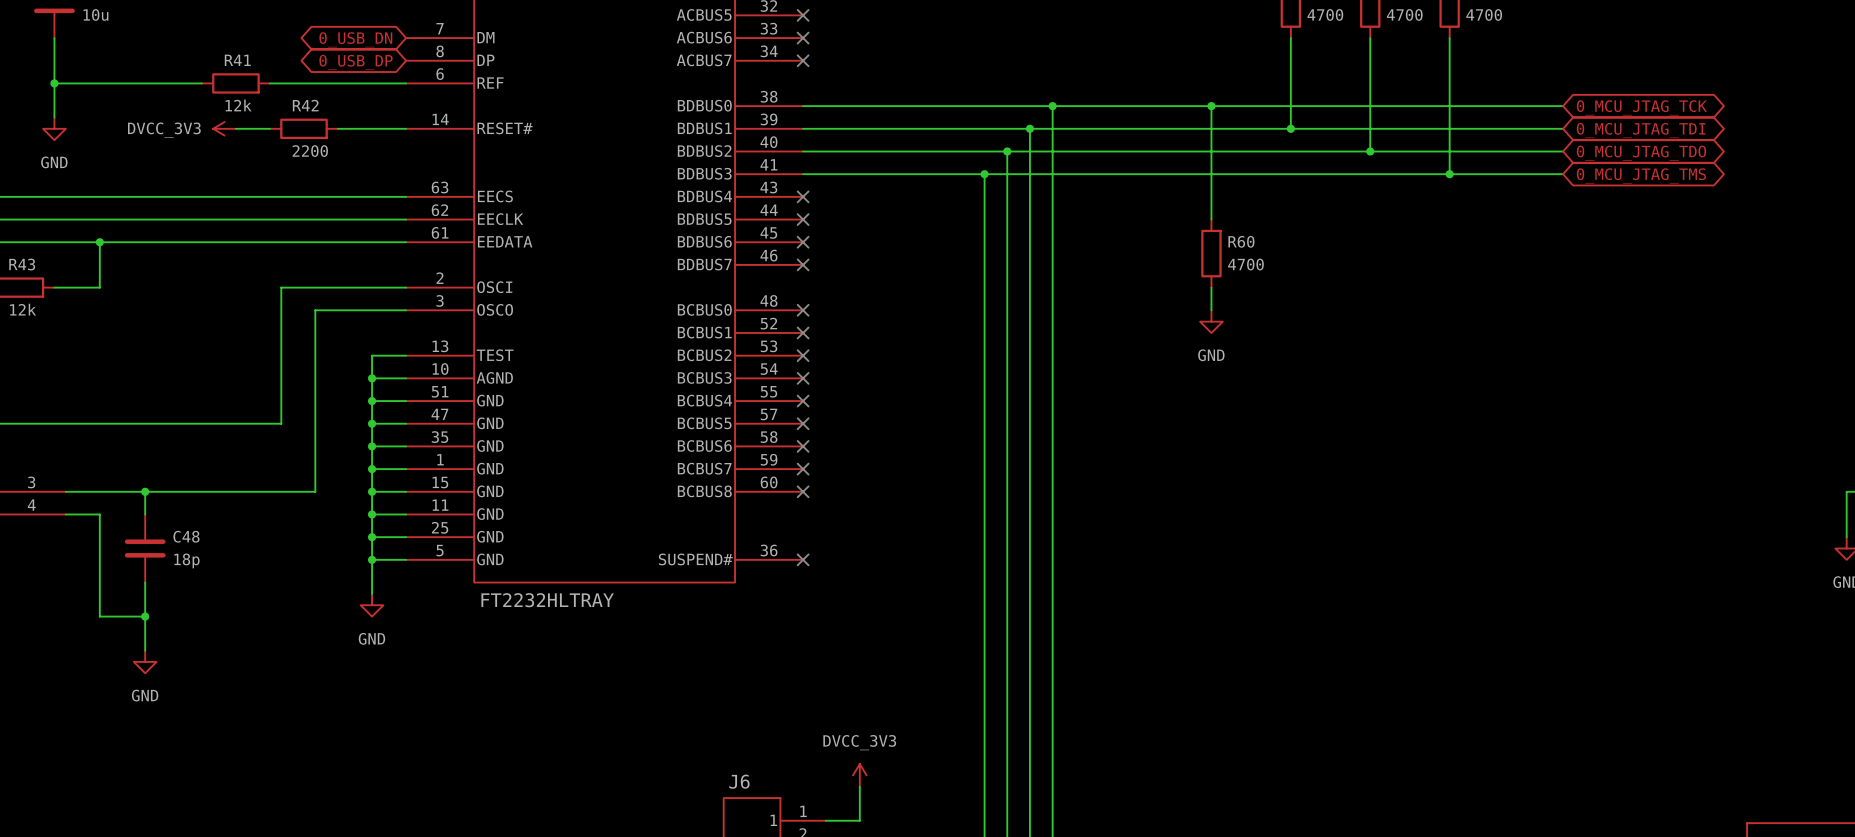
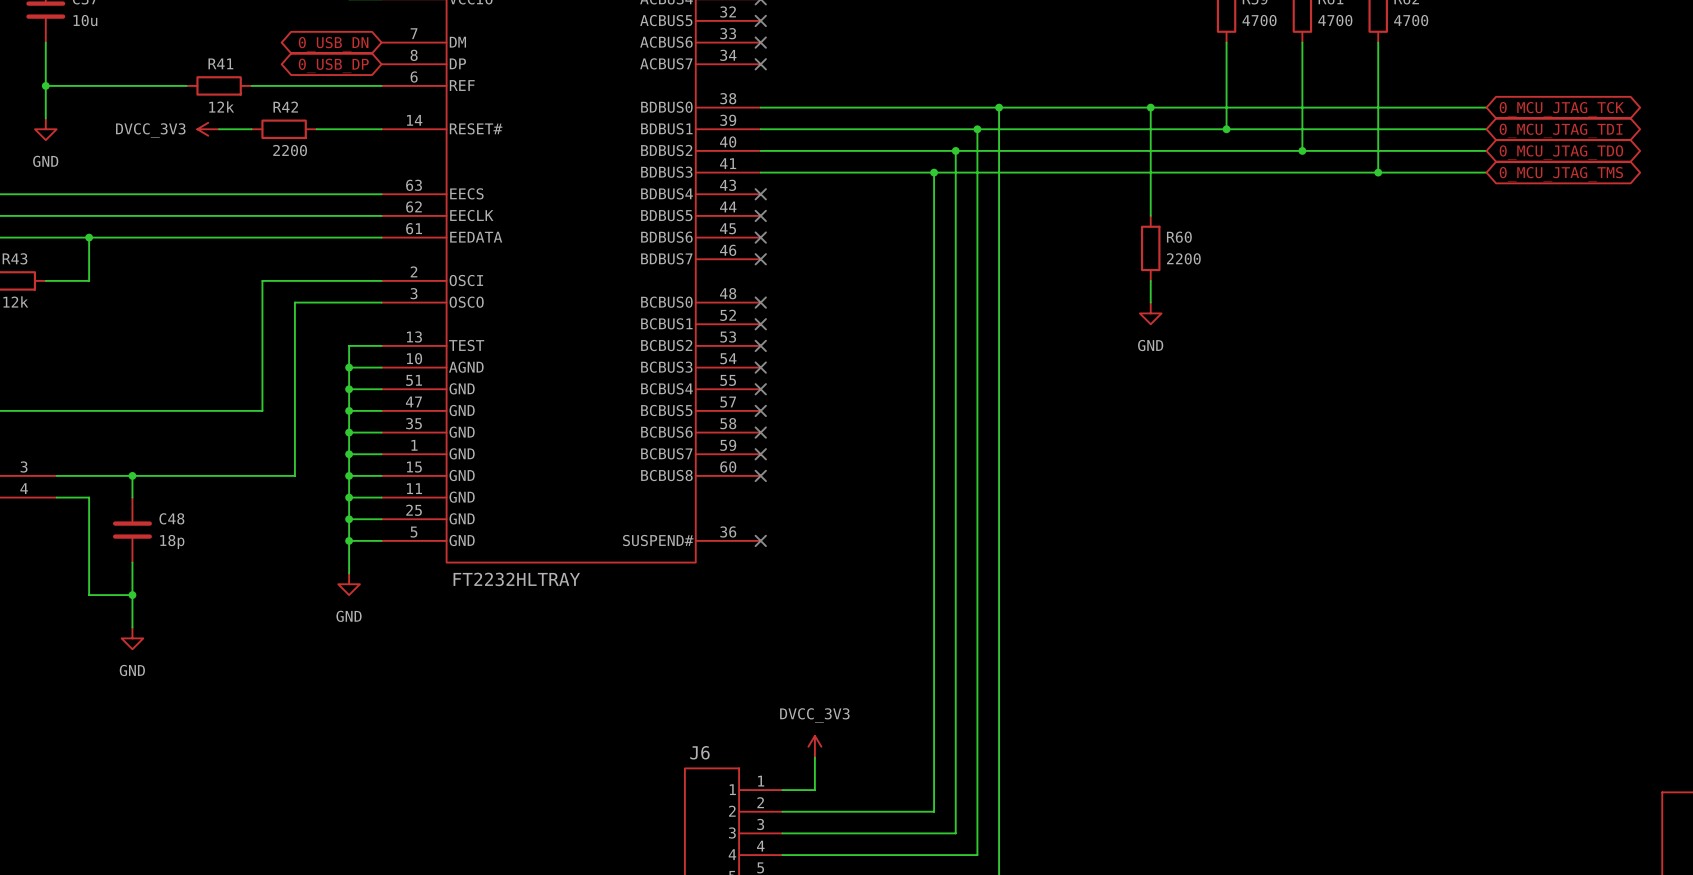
R60 value: 4700 (1245, 264) -> 2200 (1183, 258)

